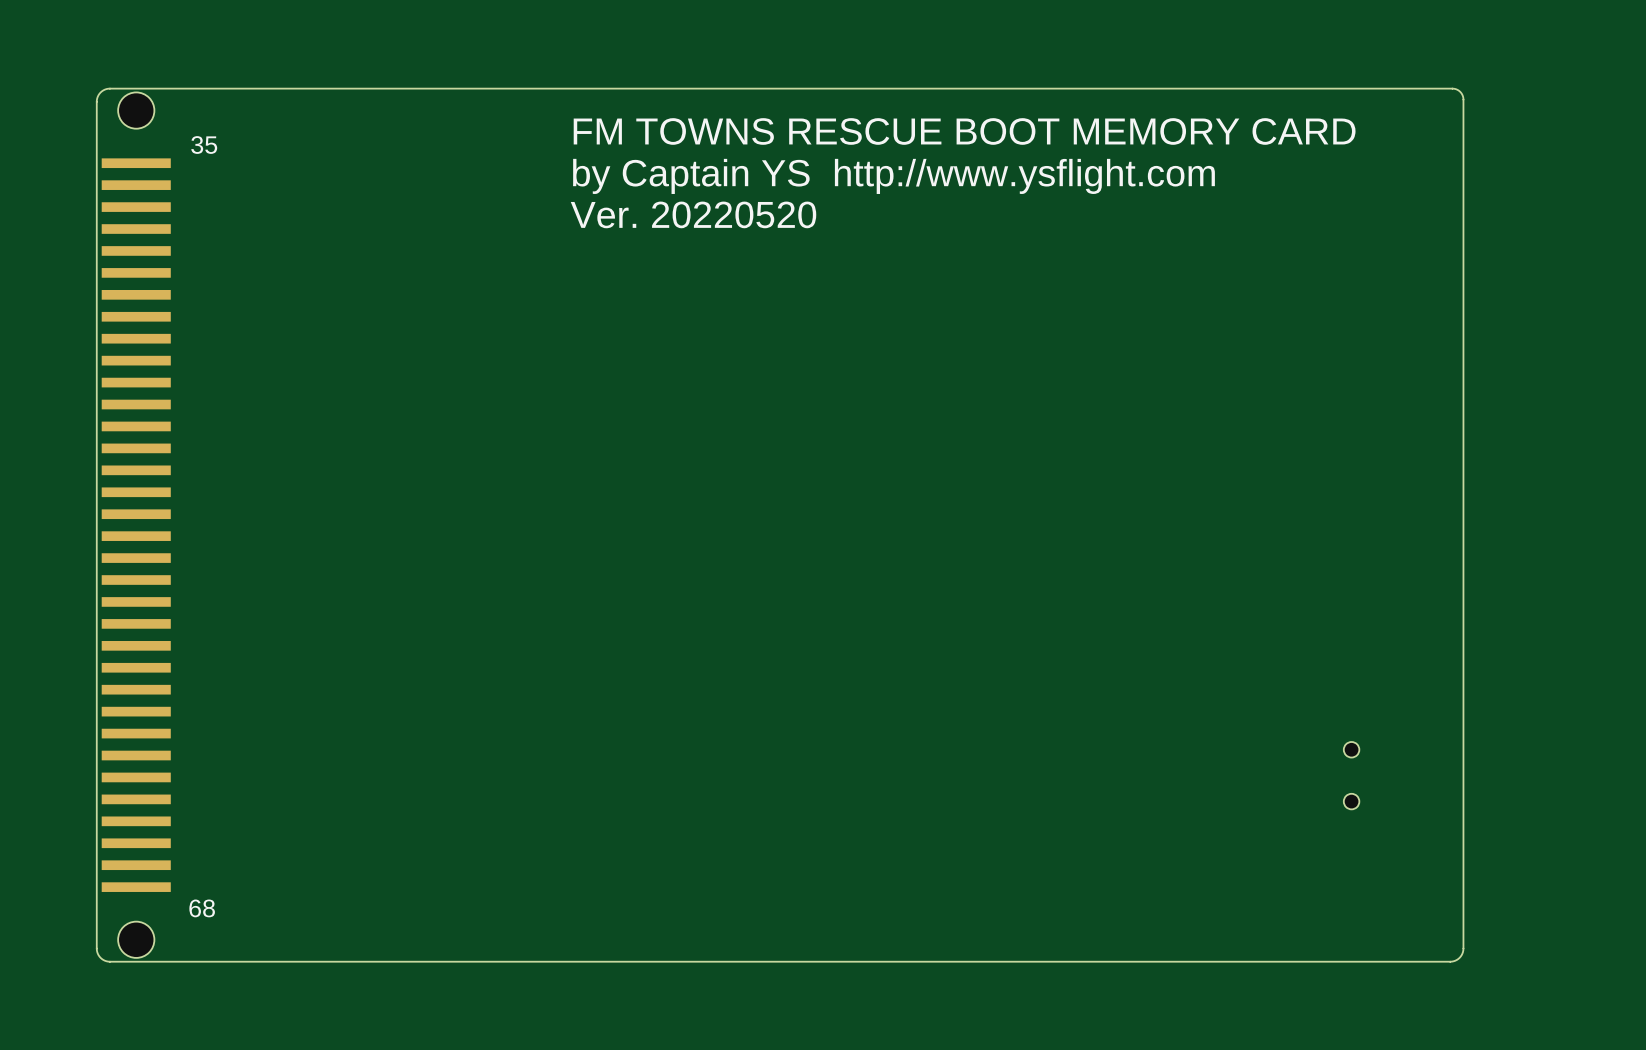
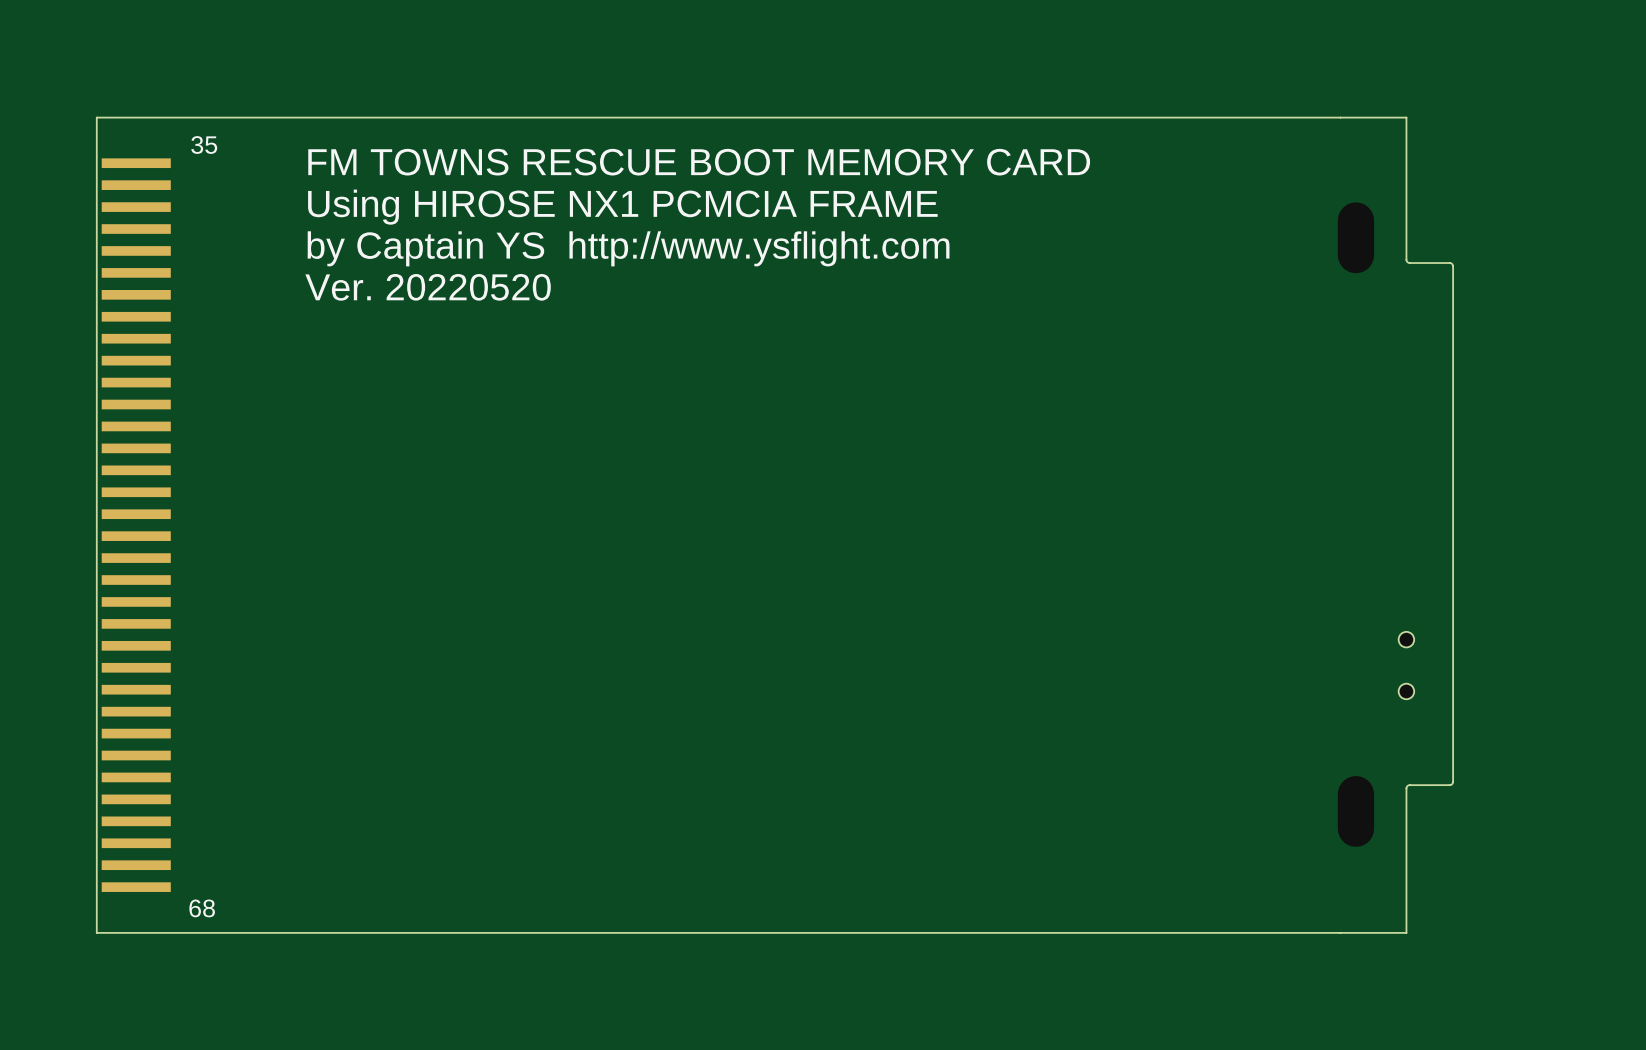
part: (136, 110) -> none
board edge: (96, 117) (97, 96) (101, 91) (109, 88) (1452, 88) (1460, 91) (1463, 99) (1463, 948) (1461, 955) (1456, 959) (1450, 961) (109, 961) (101, 959) (97, 953) (96, 932) -> (1406, 259) (1409, 262) (1450, 263) (1453, 265) (1453, 781) (1450, 785) (1409, 785) (1406, 787) (1406, 932) (96, 932)
board edge: none -> (96, 117) (1406, 117) (1406, 259)
text position: FM TOWNS RESCUE BOOT MEMORY CARD (964, 131) -> FM TOWNS RESCUE BOOT MEMORY CARD (699, 162)
text position: by Captain YS http://www.ysflight.com (893, 176) -> by Captain YS http://www.ysflight.com (628, 248)
text: none -> Using HIROSE NX1 PCMCIA FRAME (622, 207)
text position: Ver. 20220520 (693, 214) -> Ver. 20220520 (428, 287)
part: none -> (1355, 237)
part position: (1351, 775) -> (1406, 665)
part: none -> (1355, 811)
part: (136, 939) -> none

